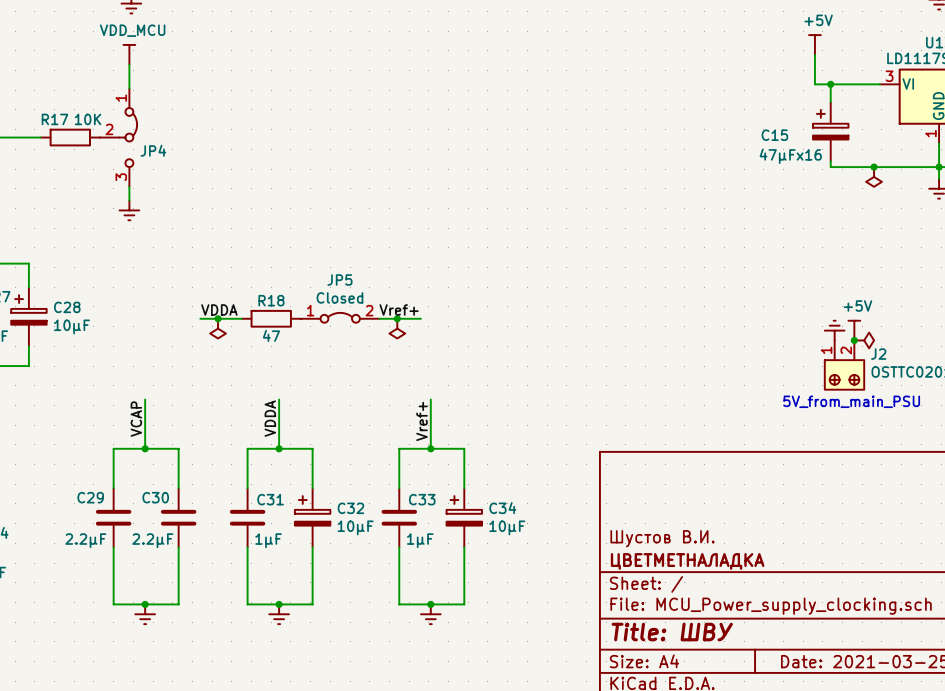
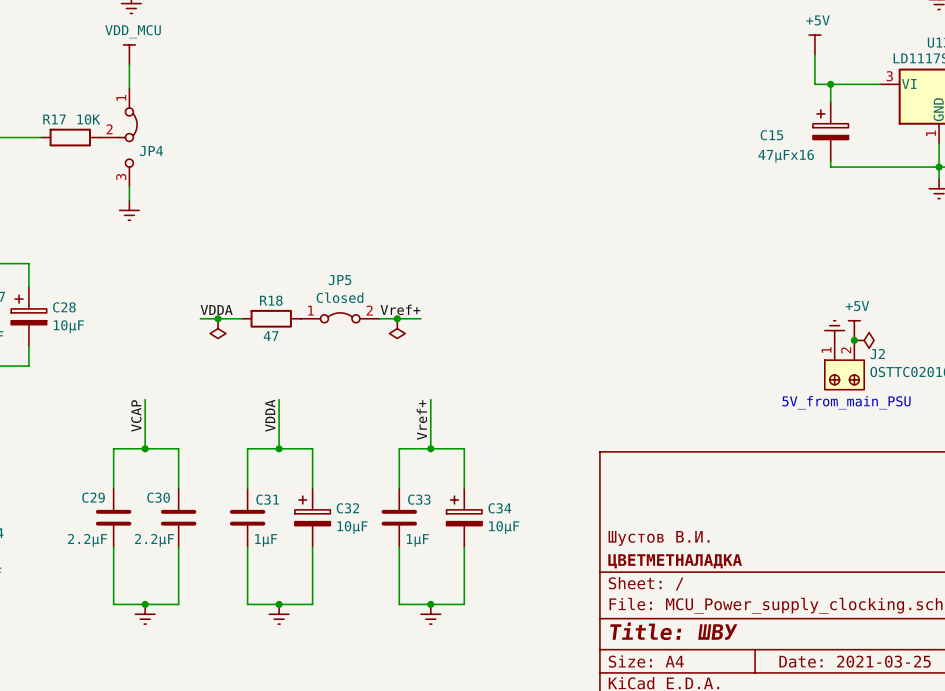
junction: (874, 167) -> none
power symbol: (874, 176) -> none

